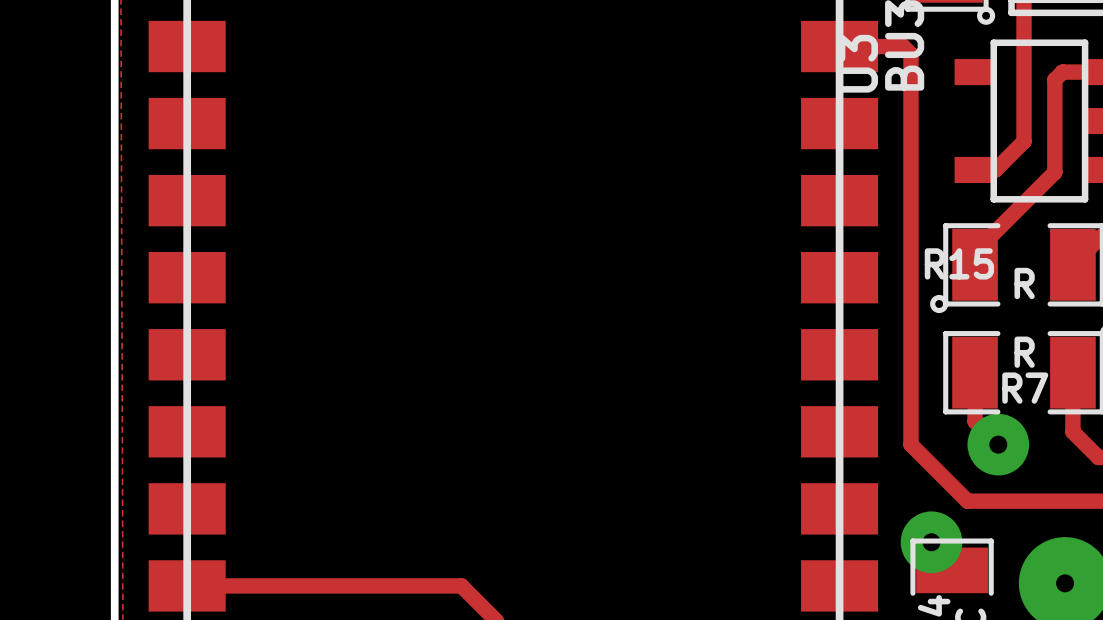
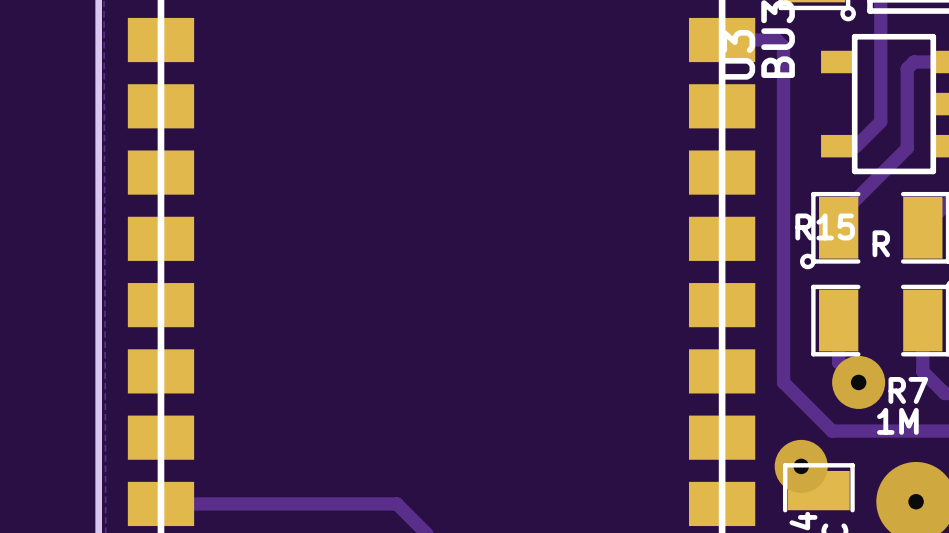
R7 value: R (1024, 352) -> 1M (897, 421)
R7 name position: R7 (1025, 388) -> R7 (908, 390)

